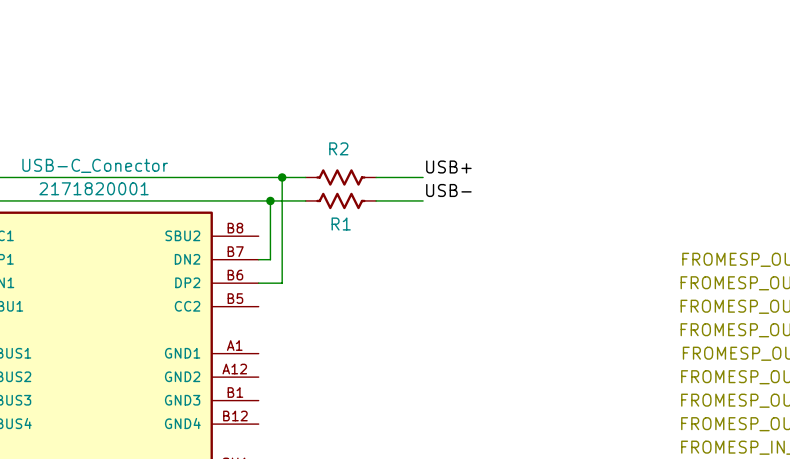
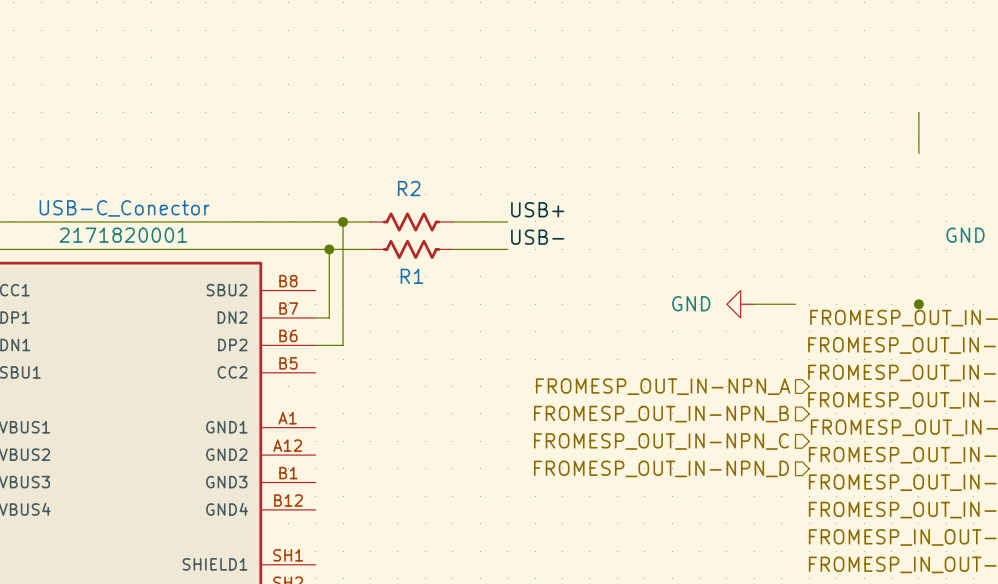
wire: none -> (918, 112) (918, 153)
power symbol: none -> GND (740, 304)
wire: none -> (754, 304) (795, 304)
junction: none -> (918, 304)
hierarchical label: none -> FROMESP_OUT_IN-NPN_A (663, 386)
hierarchical label: none -> FROMESP_OUT_IN-NPN_B (661, 414)
hierarchical label: none -> FROMESP_OUT_IN-NPN_C (661, 441)
hierarchical label: none -> FROMESP_OUT_IN-NPN_D (661, 468)

